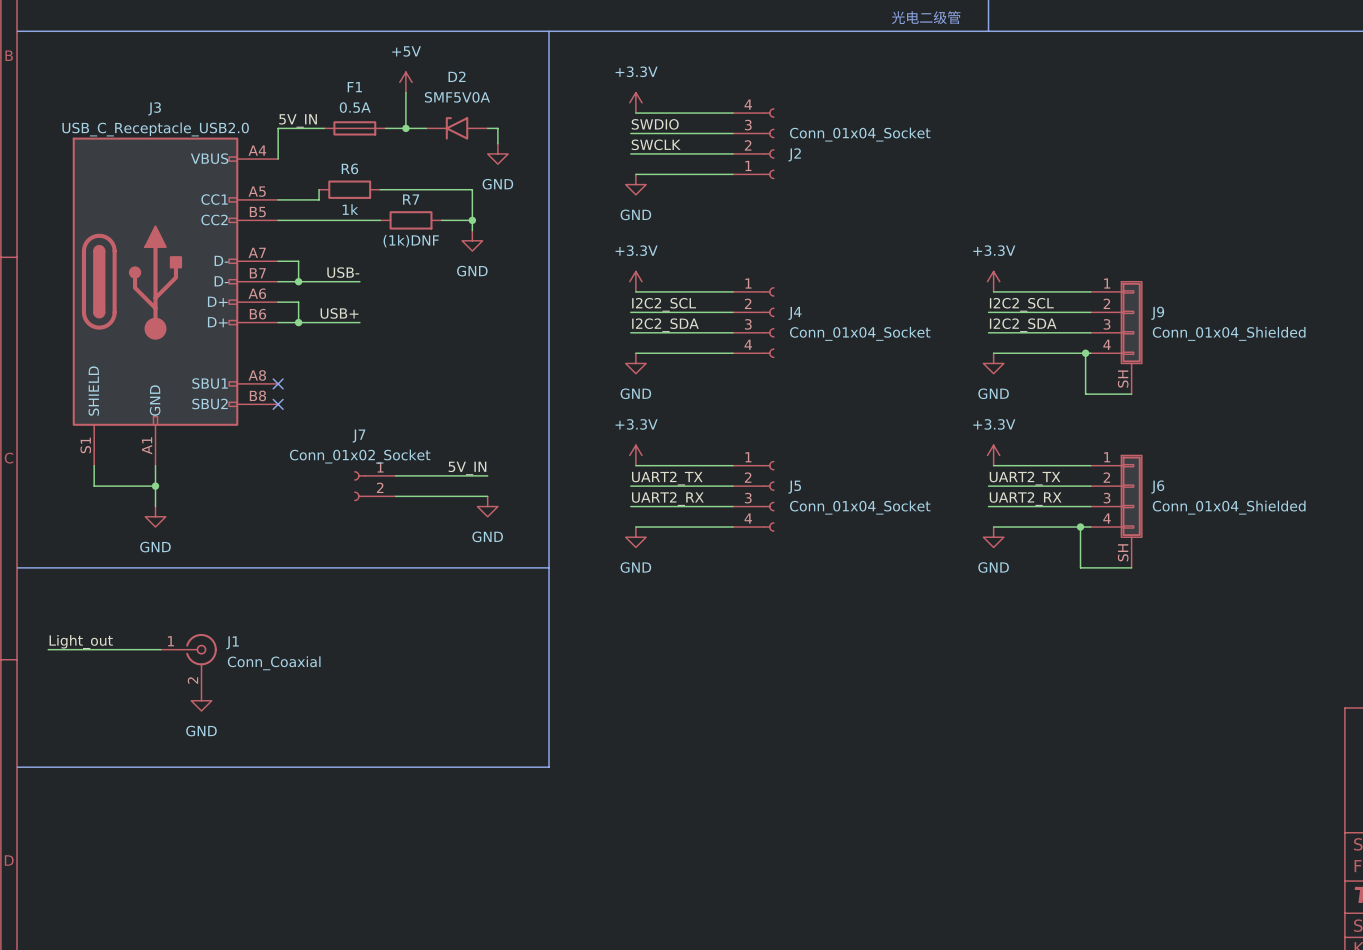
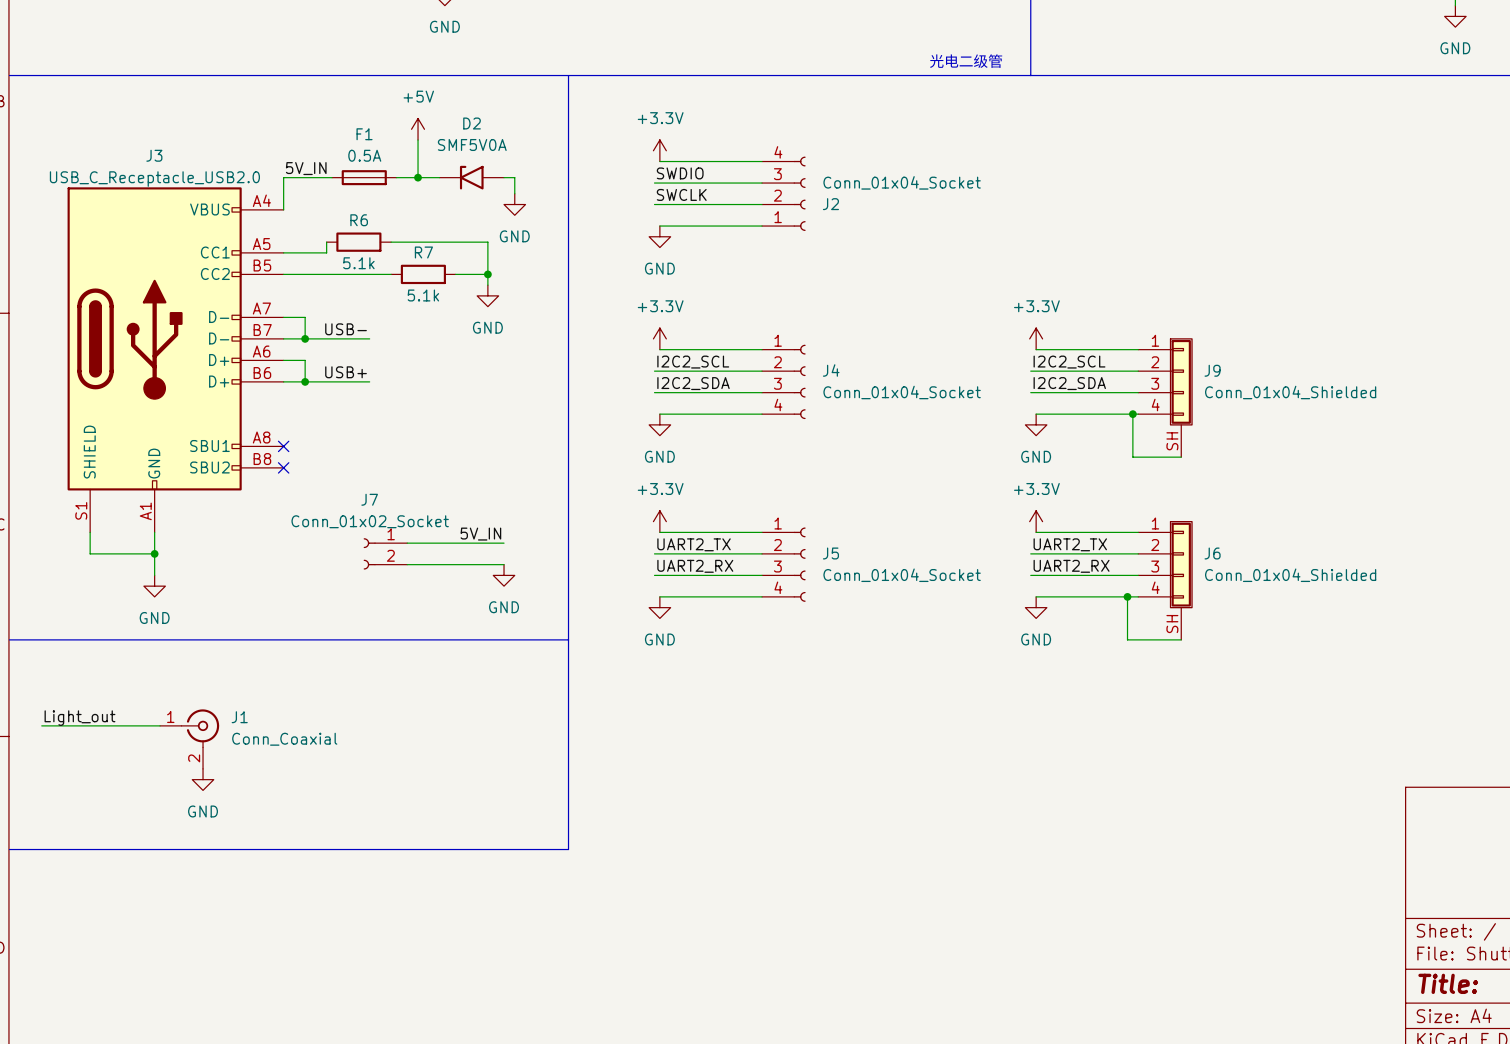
R6 value: 1k (350, 209) -> 5.1k (358, 263)
R7 value: (1k)DNF (411, 241) -> 5.1k (423, 295)

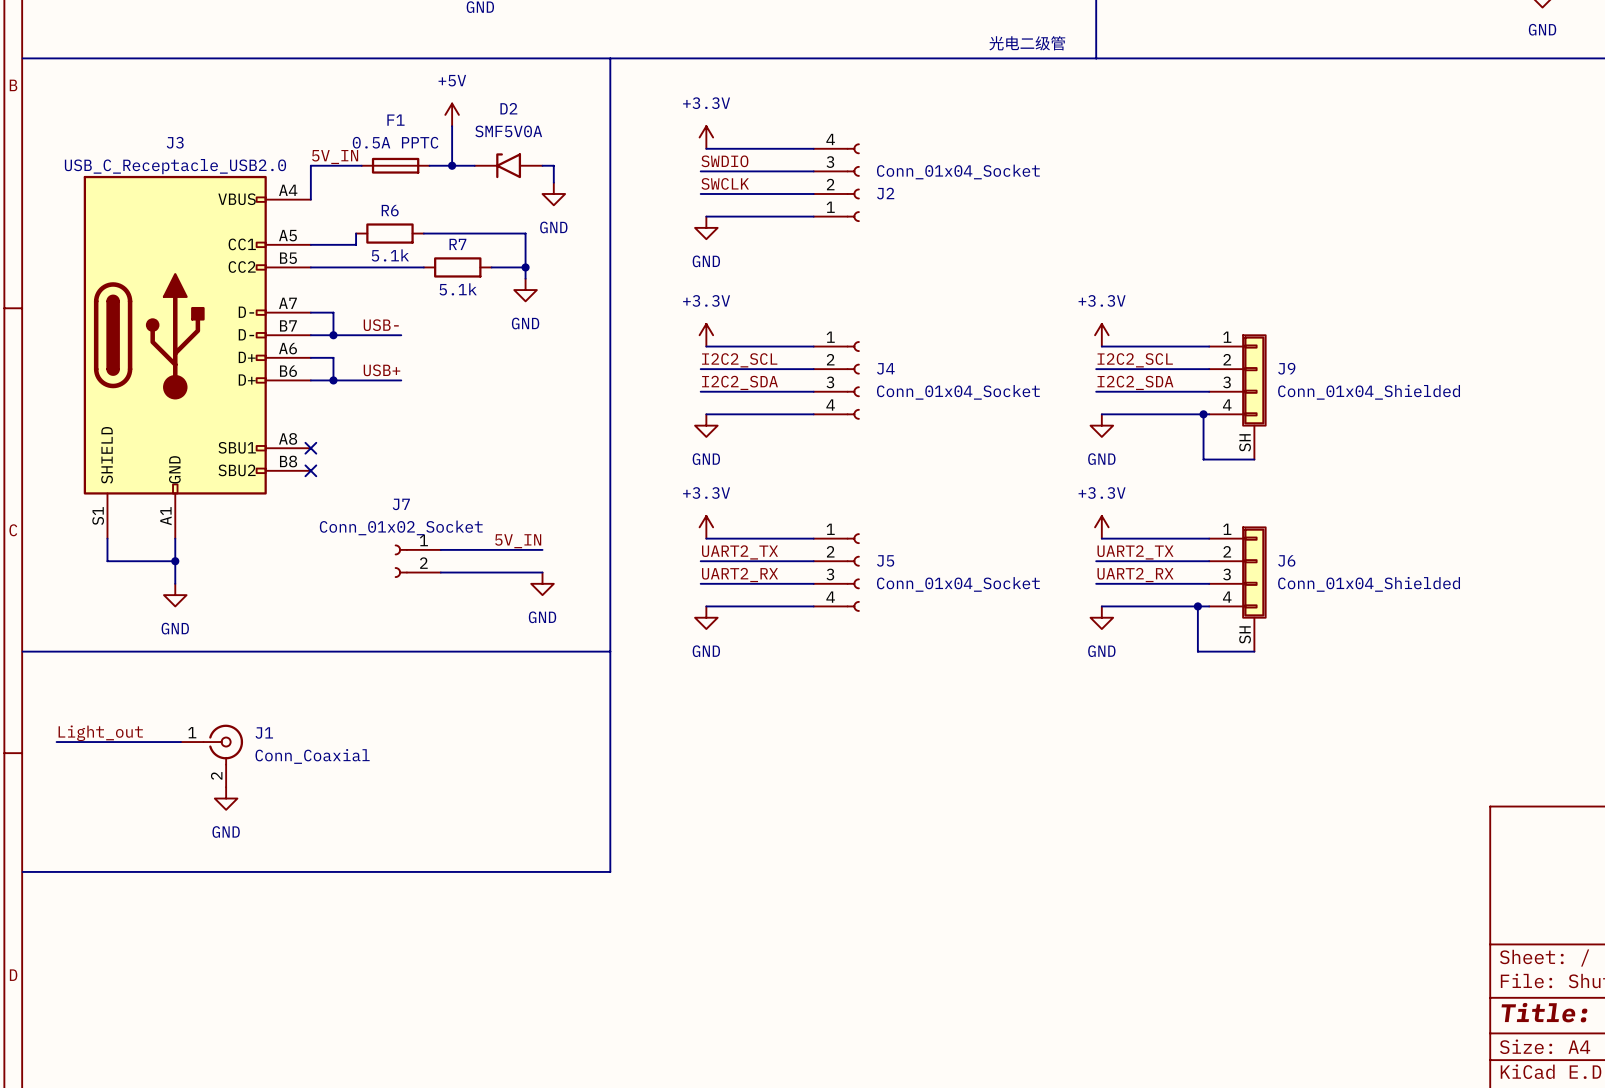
F1 value: 0.5A (364, 155) -> 0.5A PPTC (395, 142)

